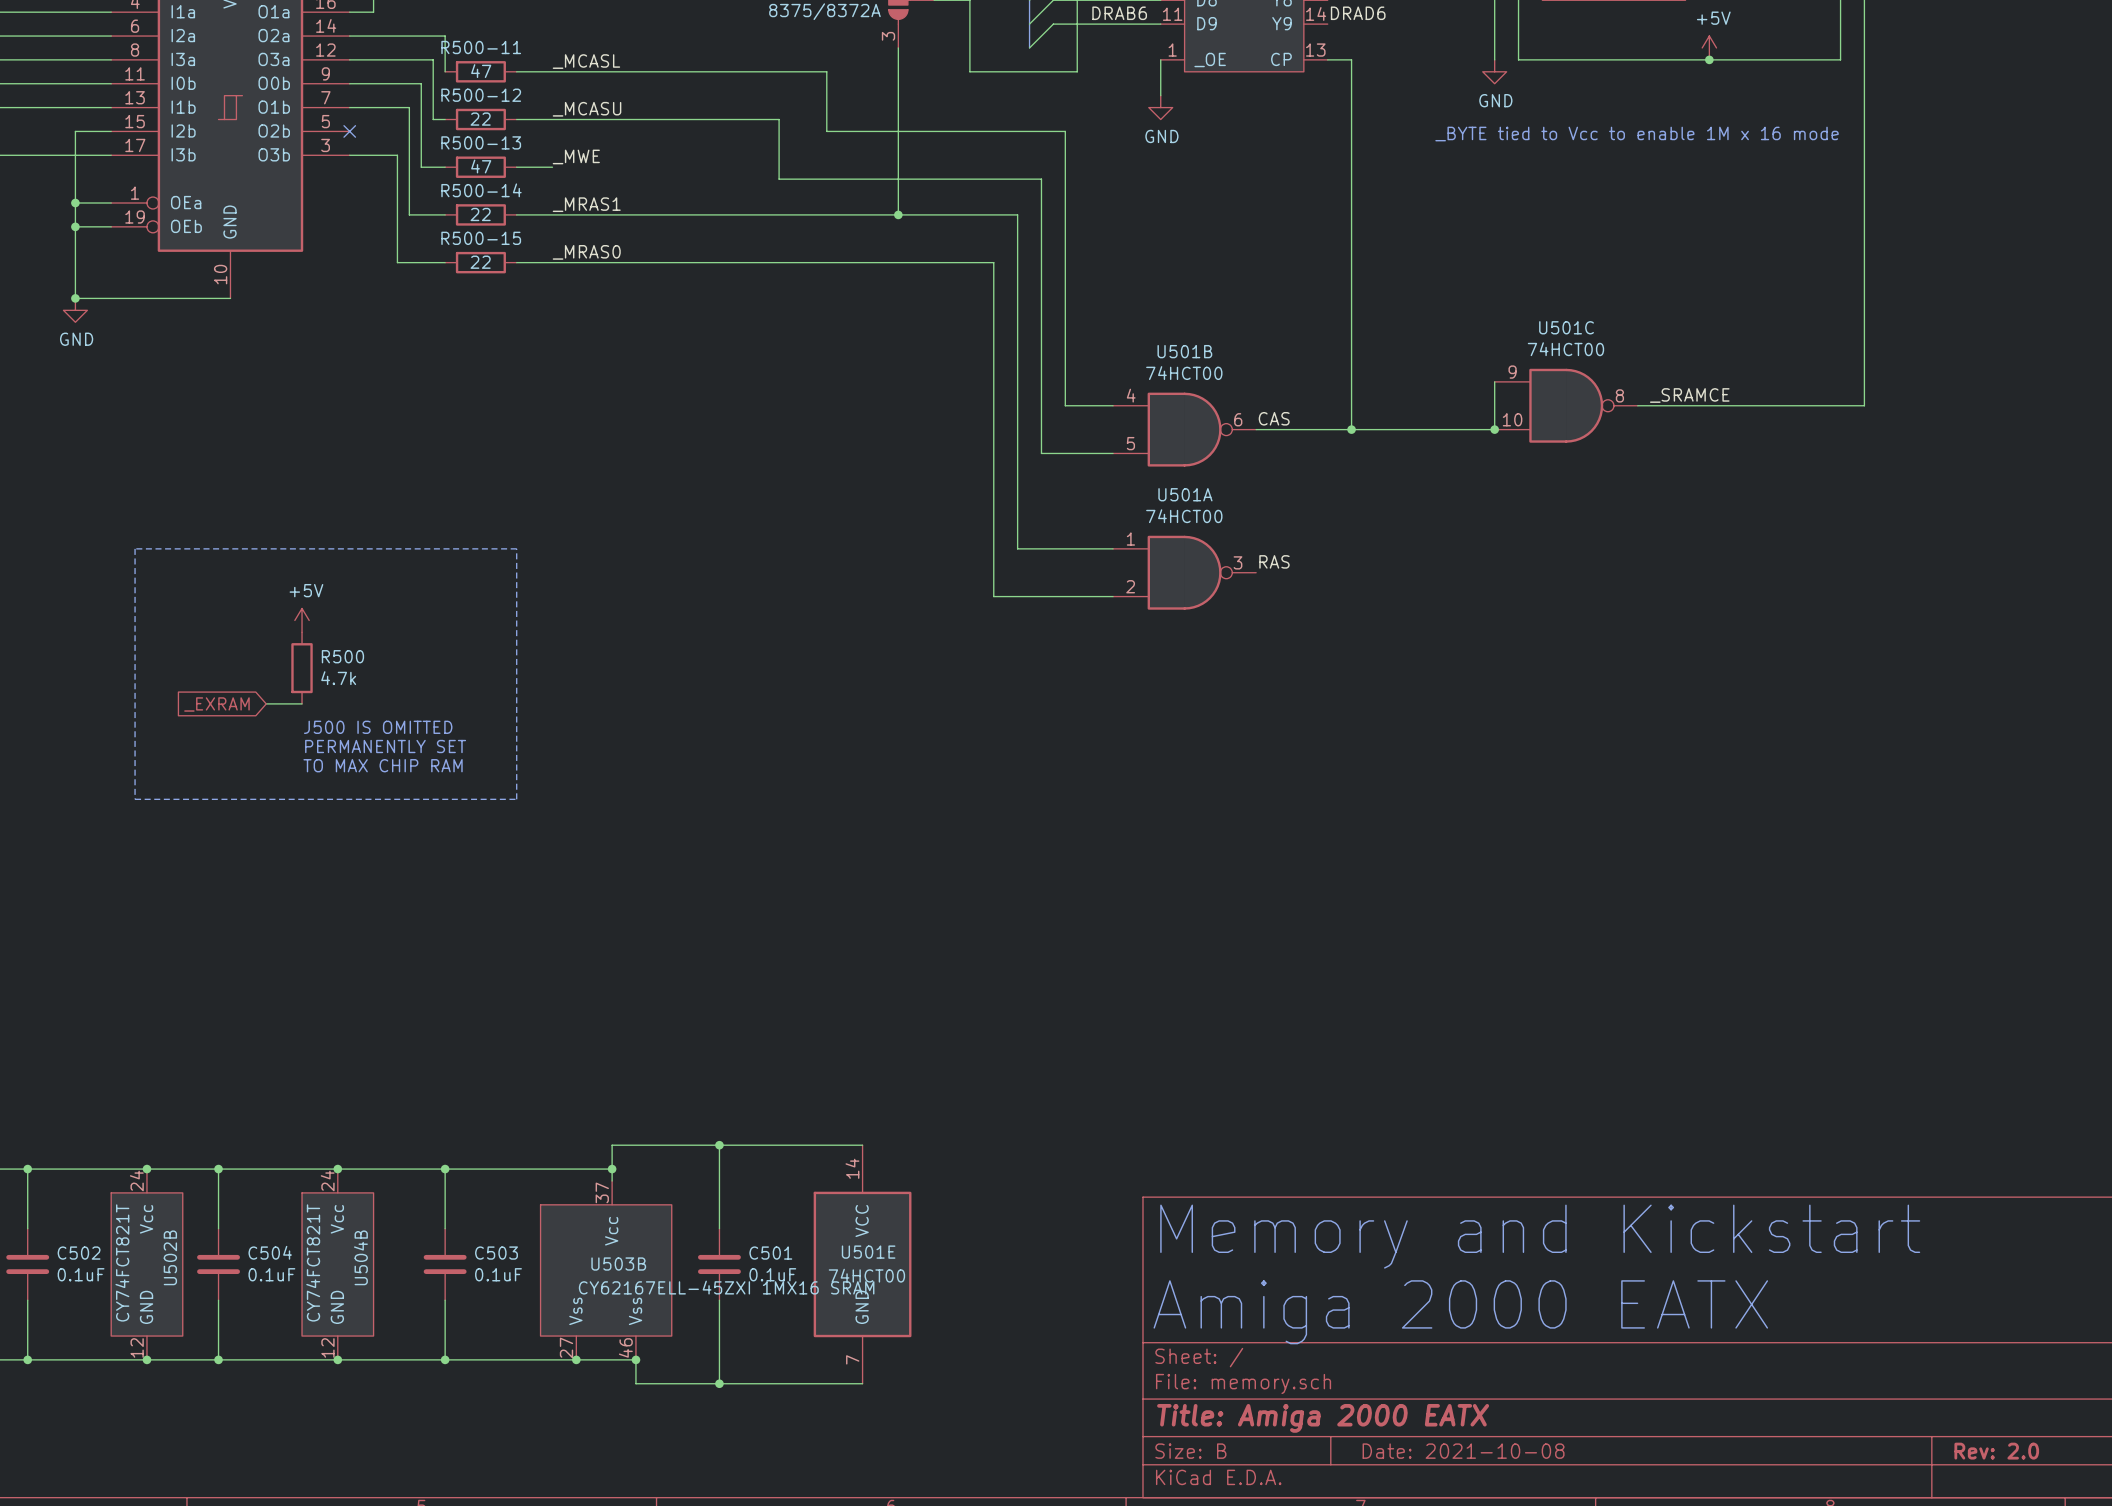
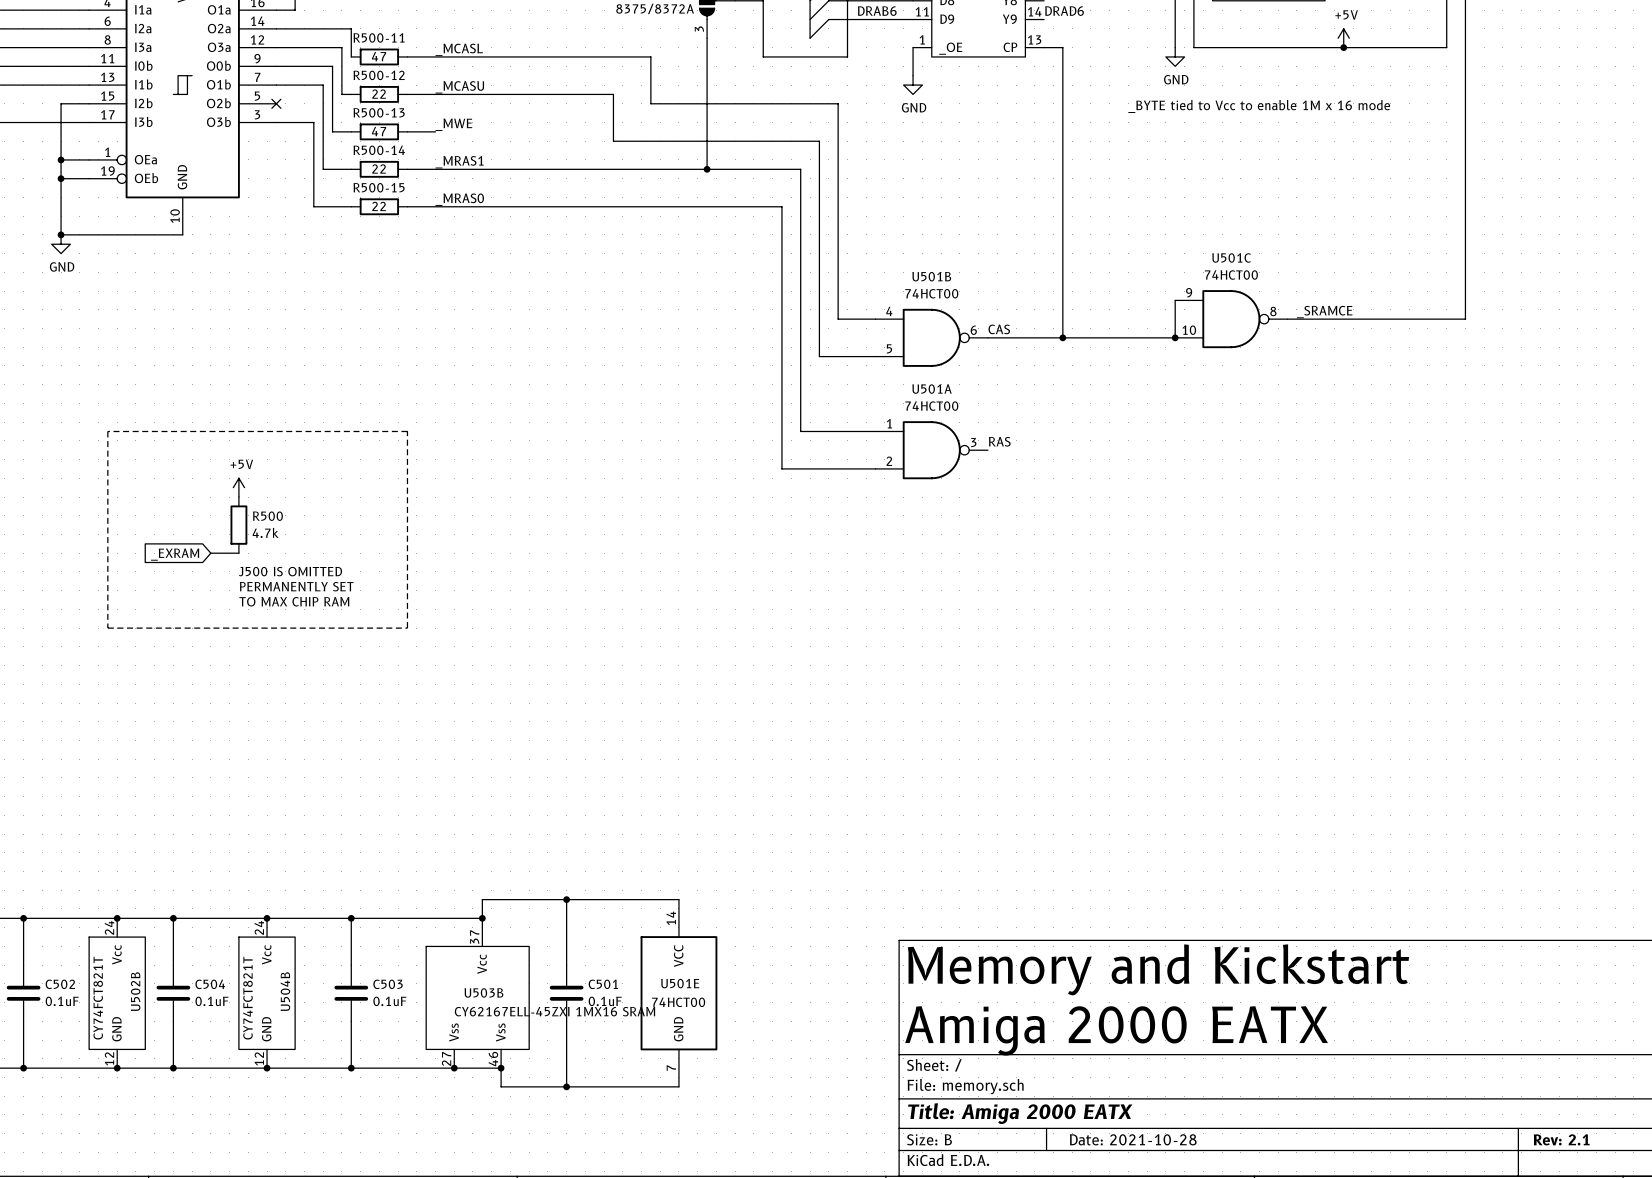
title block: Date: 2021-10-08 (1463, 1451) -> Date: 2021-10-28 (1133, 1139)
title block: Rev: 2.0 (1996, 1451) -> Rev: 2.1 (1561, 1139)

